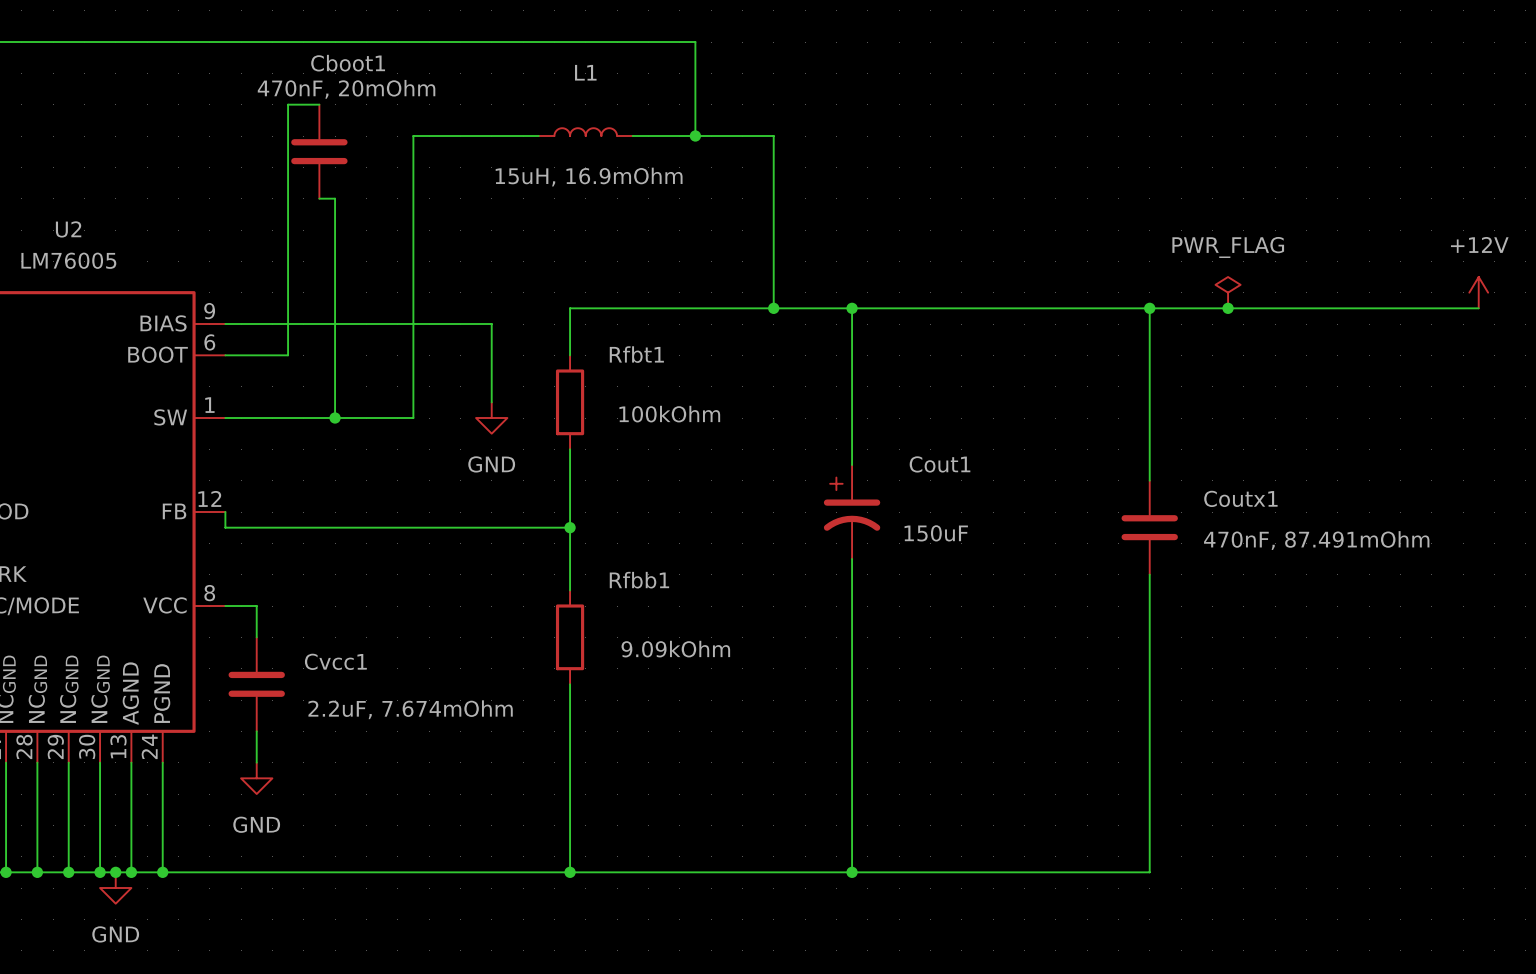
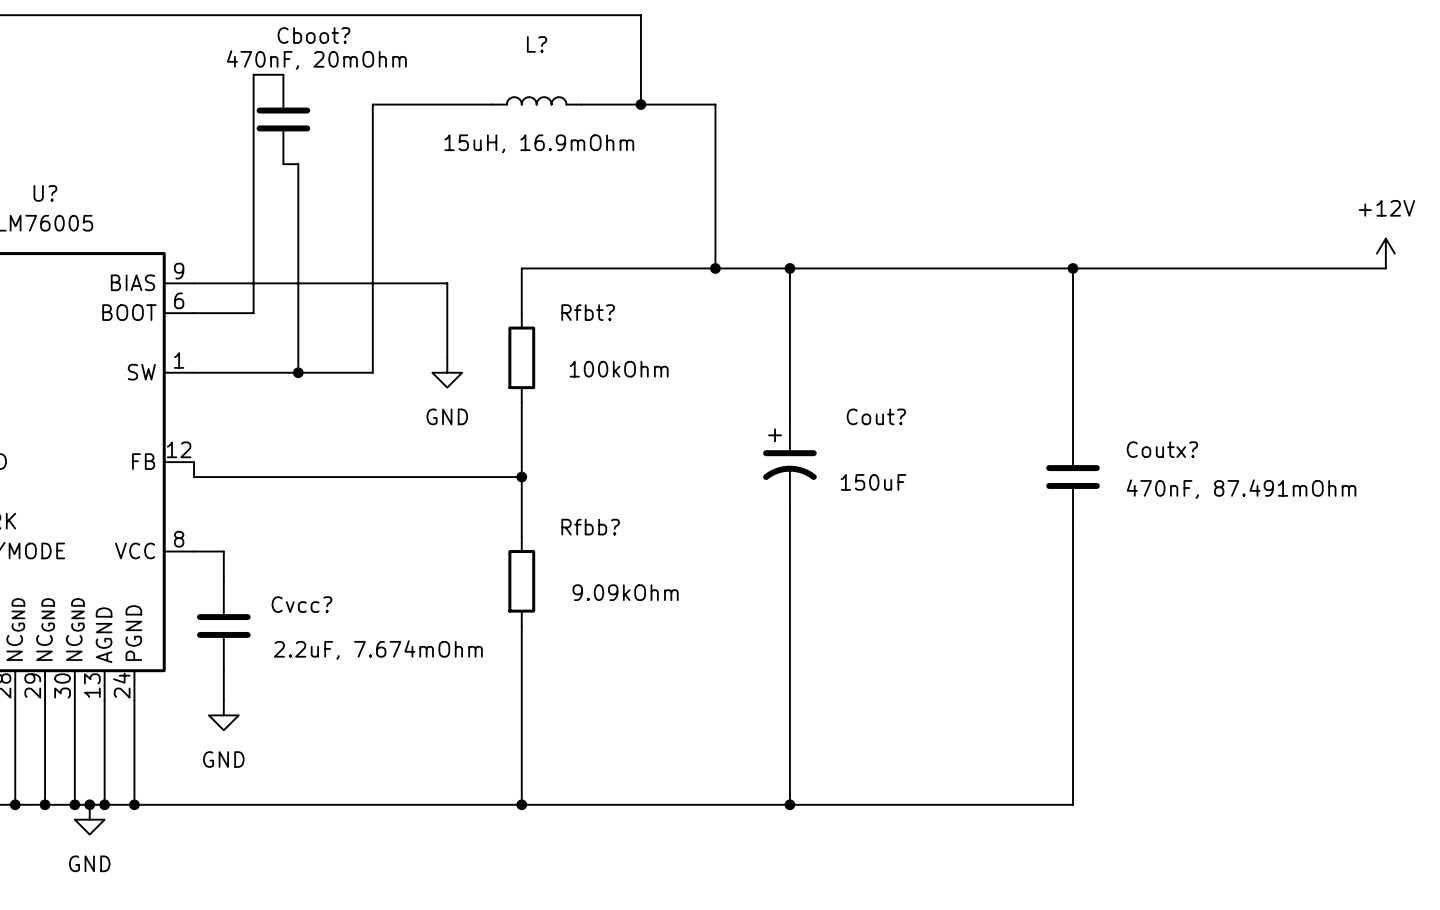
Cboot1 name: Cboot1 (348, 63) -> Cboot? (313, 35)
L1 name: L1 (585, 72) -> L? (537, 44)
U2 name: U2 (68, 229) -> U? (45, 193)
power symbol: PWR_FLAG (1228, 292) -> none
junction: (1228, 308) -> none
Rfbt1 name: Rfbt1 (636, 354) -> Rfbt? (588, 312)
Cout1 name: Cout1 (940, 464) -> Cout? (876, 416)
Coutx1 name: Coutx1 (1240, 498) -> Coutx? (1162, 449)
Rfbb1 name: Rfbb1 (639, 580) -> Rfbb? (590, 527)
Cvcc1 name: Cvcc1 (335, 661) -> Cvcc? (301, 604)

